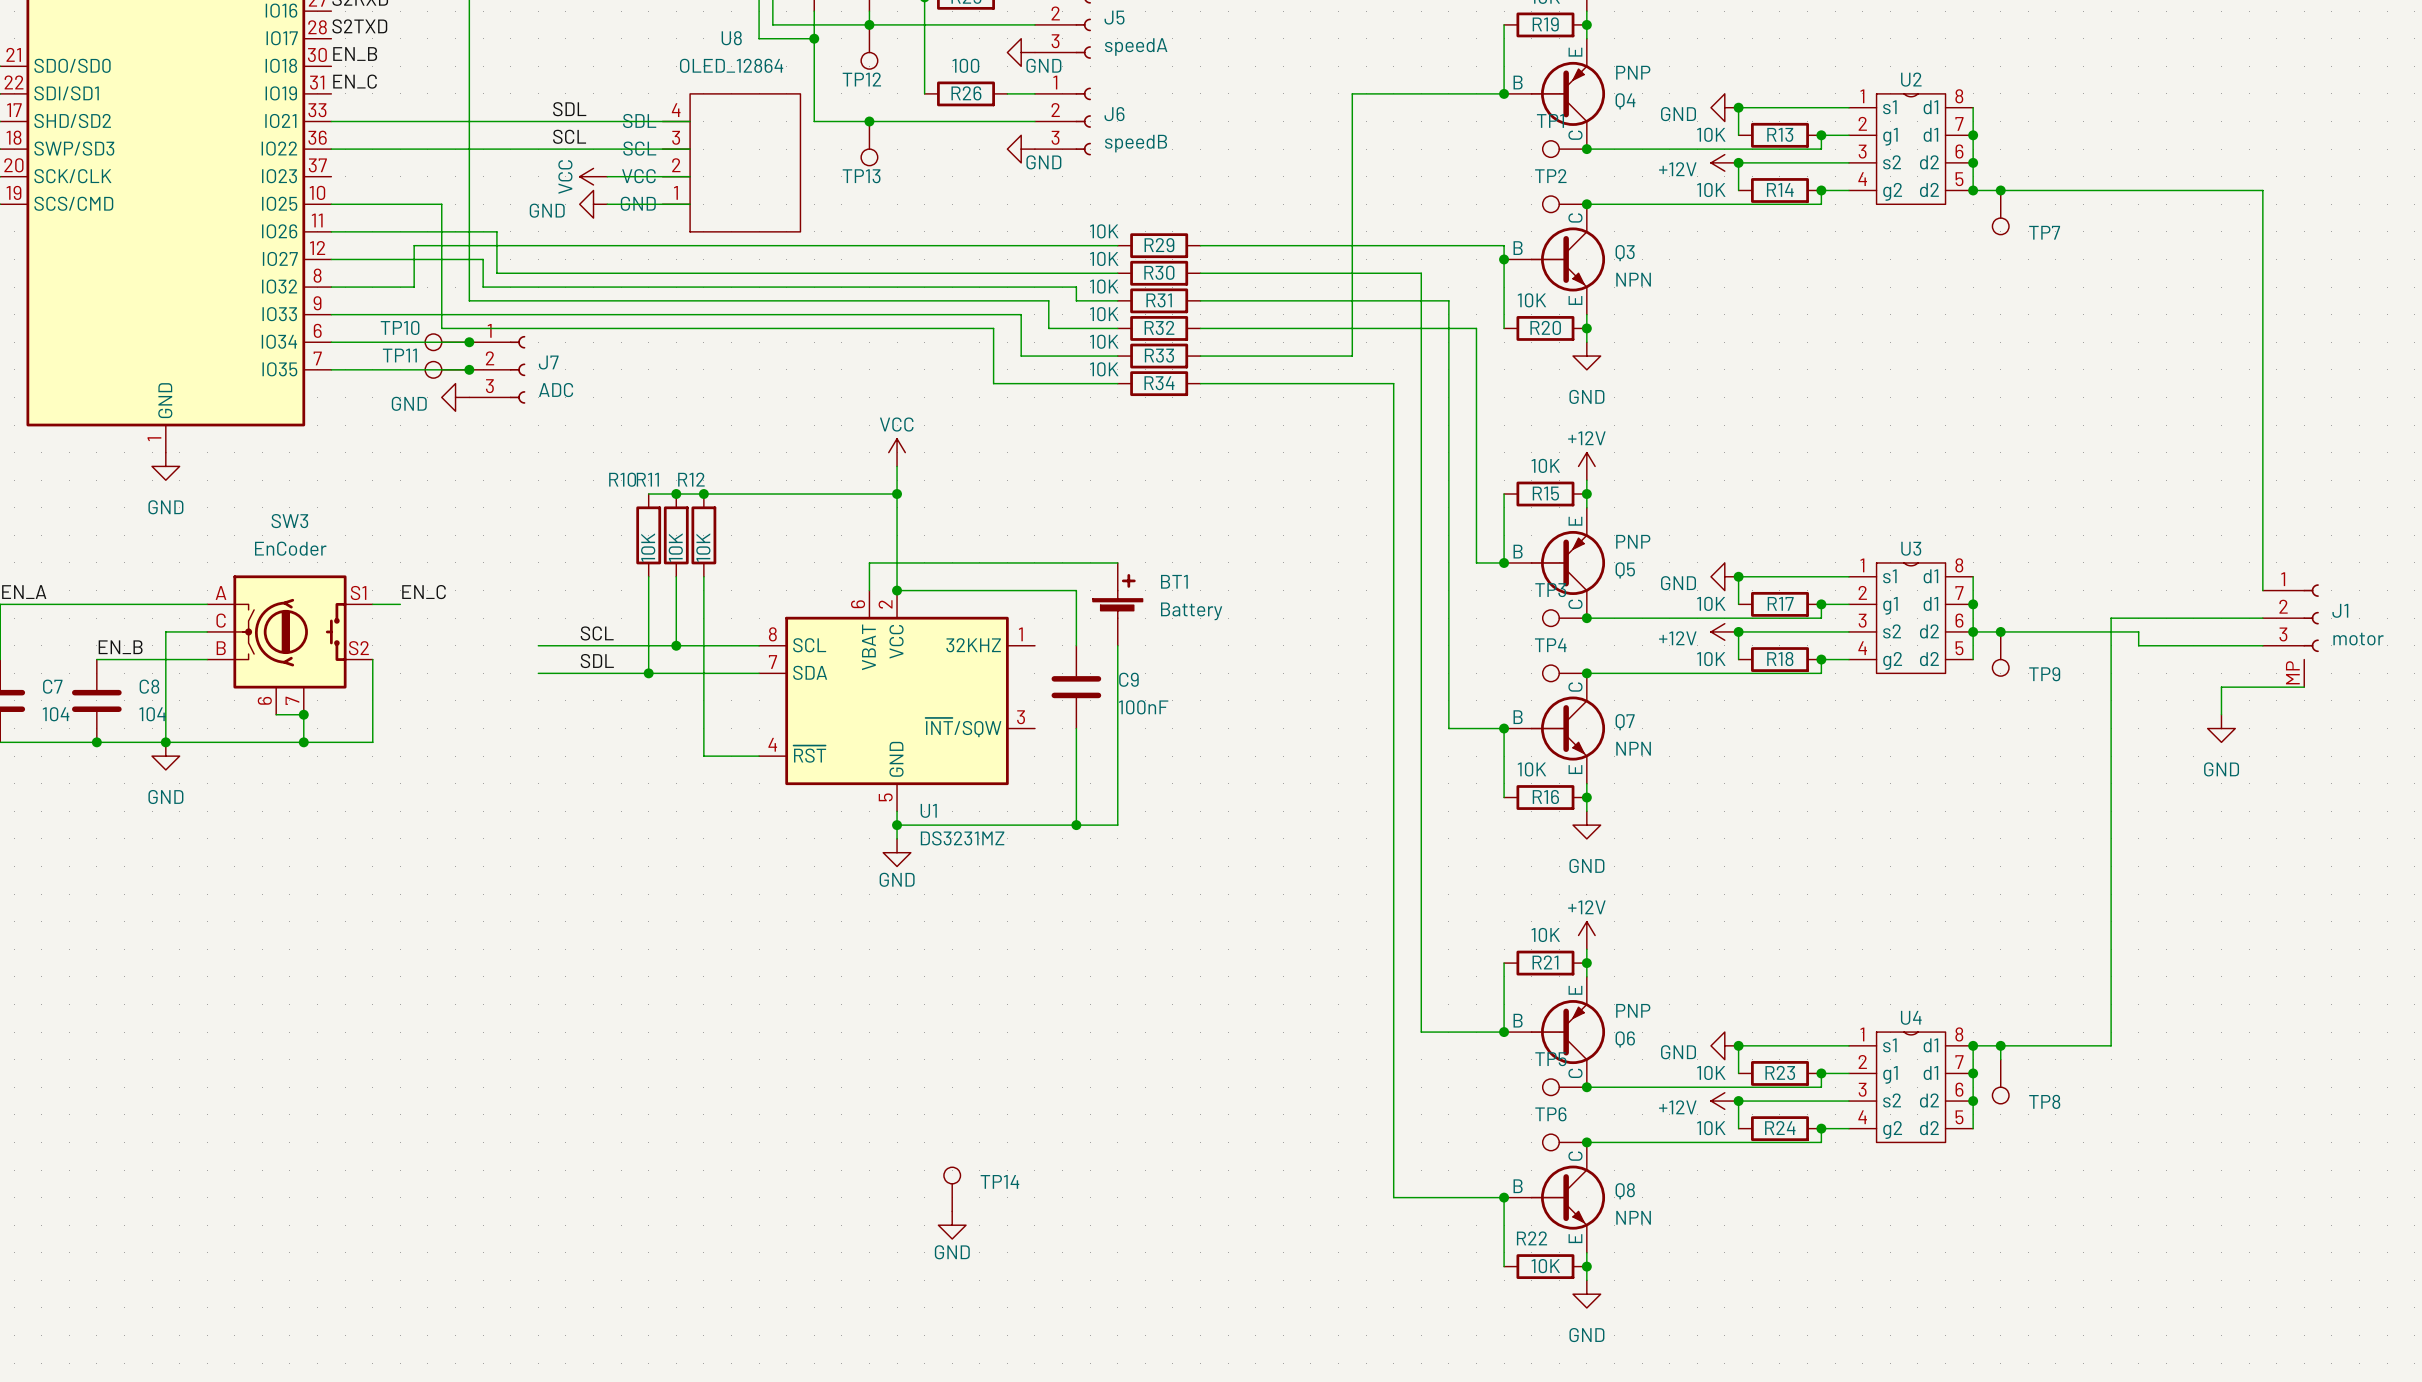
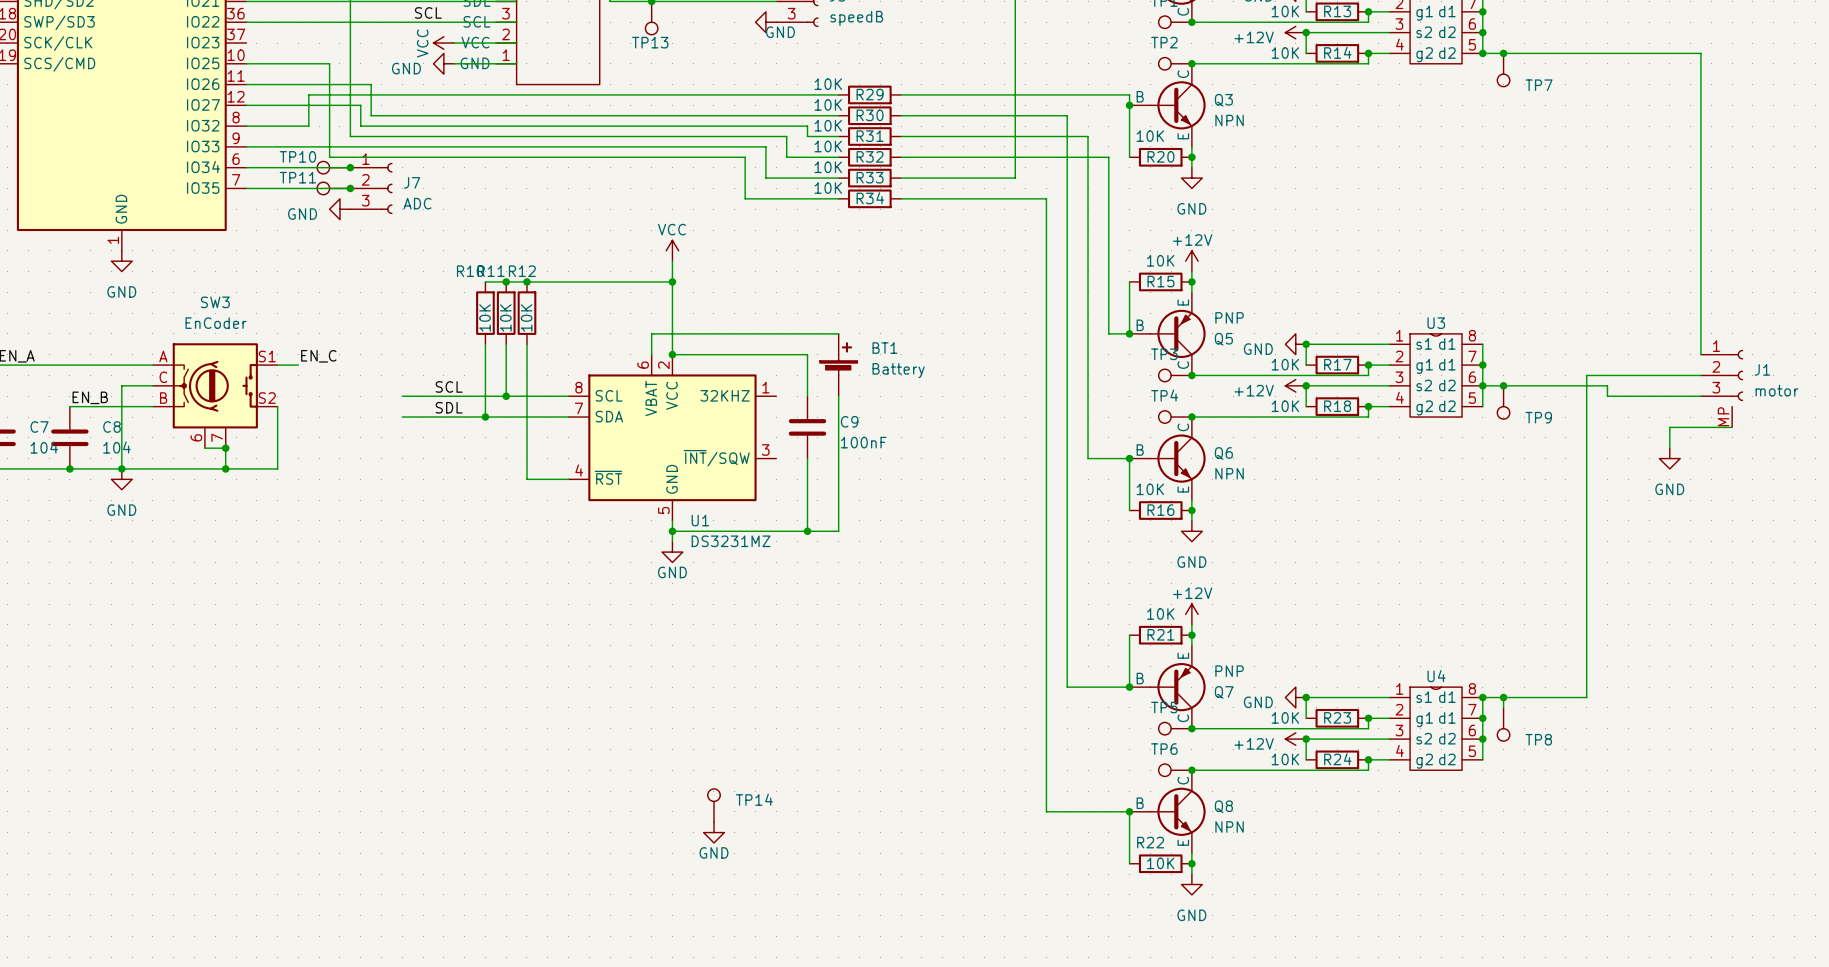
Q7 name: Q7 (1625, 722) -> Q6 (1223, 453)
Q6 name: Q6 (1625, 1039) -> Q7 (1224, 692)

